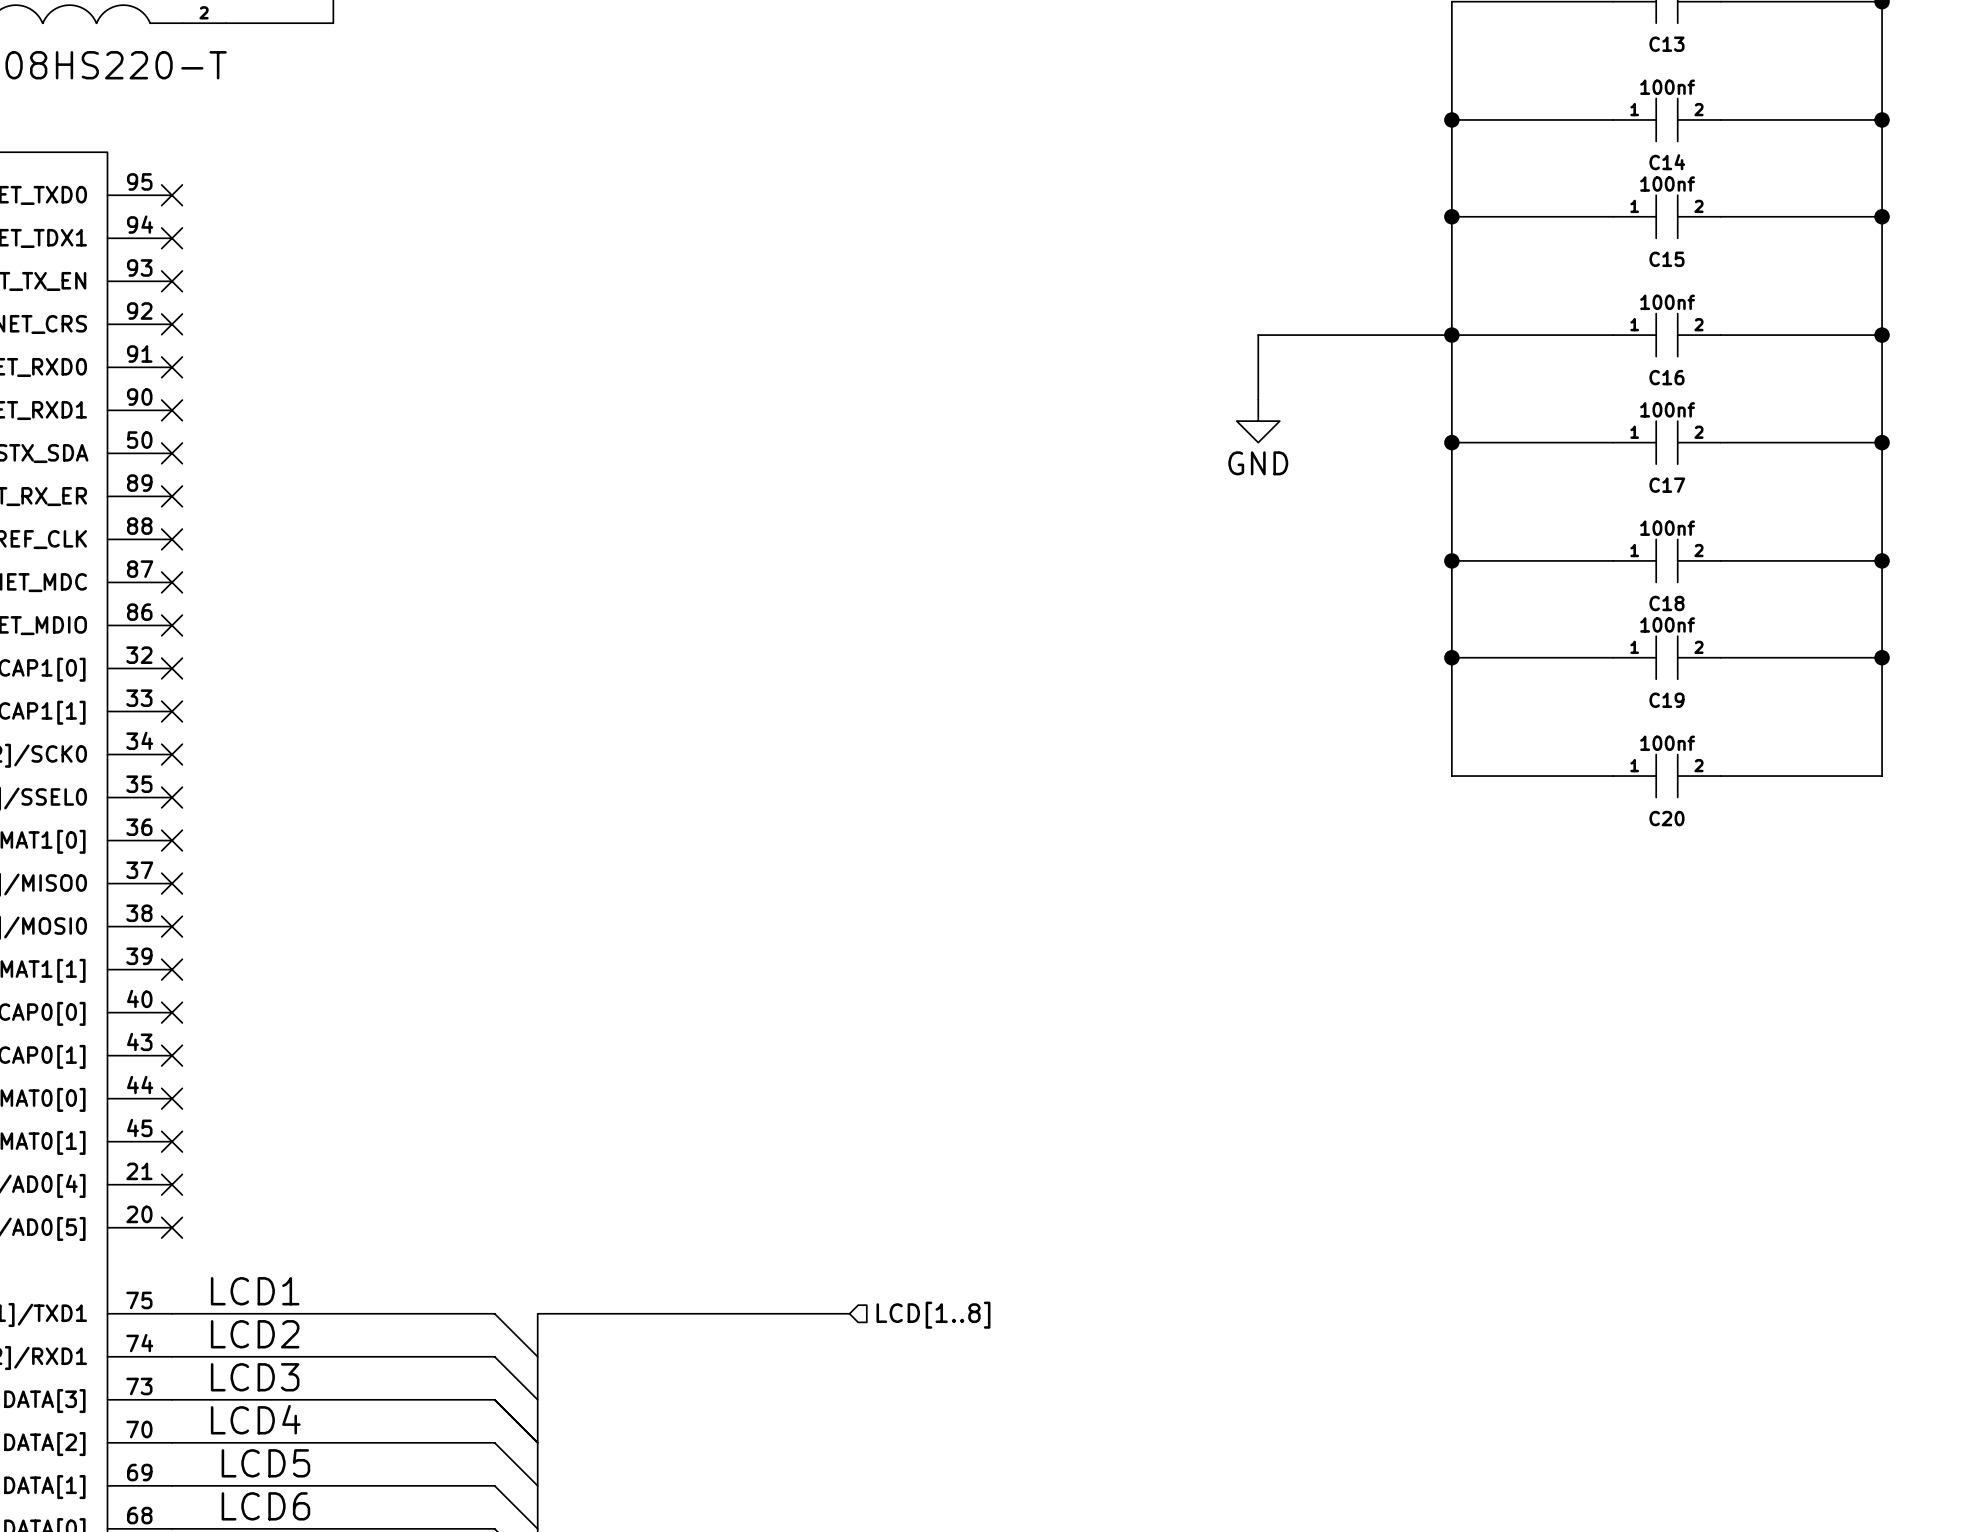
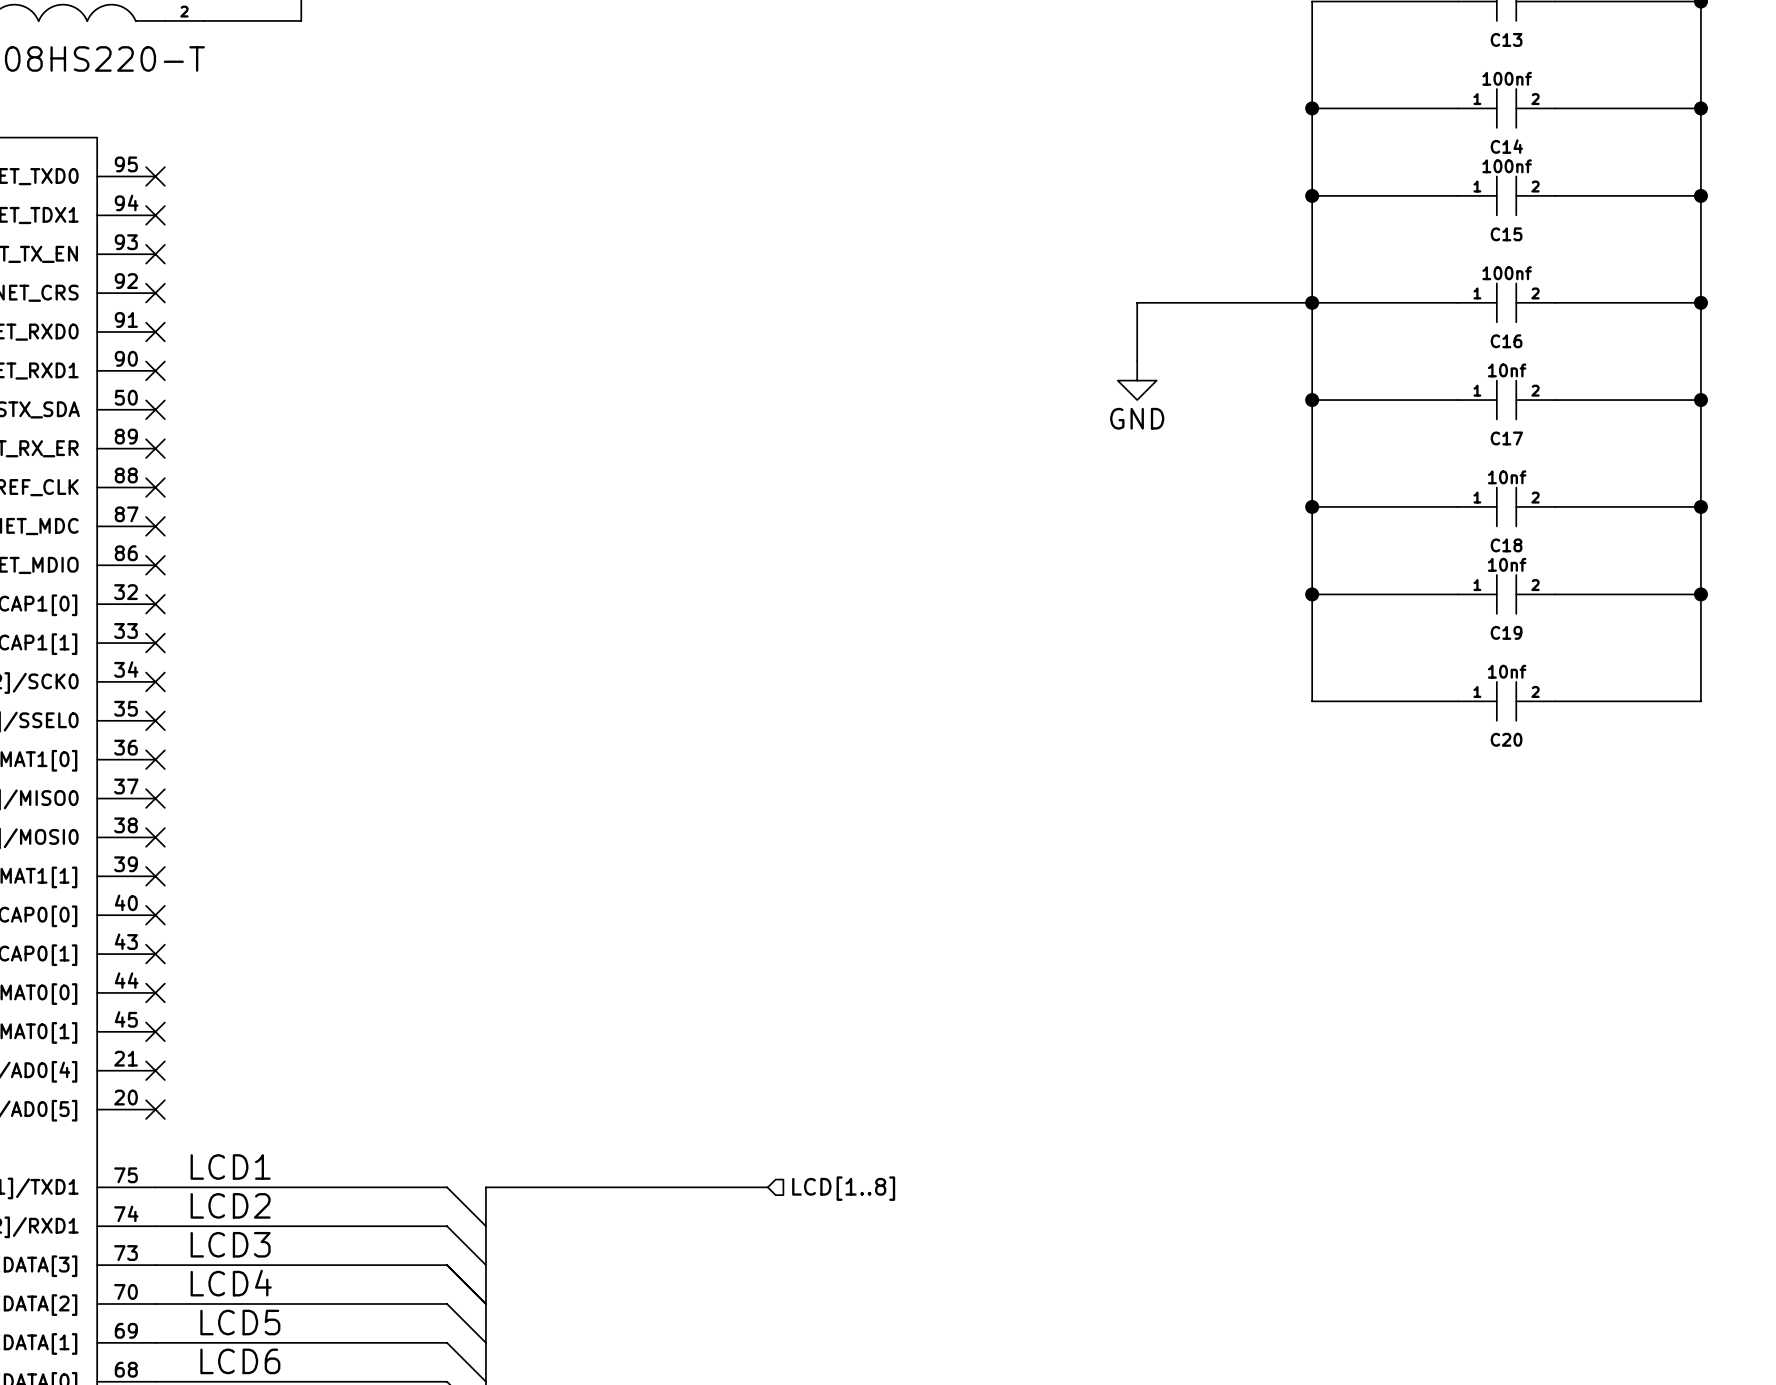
C17 value: 100nf (1667, 409) -> 10nf (1507, 370)
C18 value: 100nf (1667, 528) -> 10nf (1507, 477)
C19 value: 100nf (1667, 624) -> 10nf (1507, 564)
C20 value: 100nf (1667, 743) -> 10nf (1507, 671)

